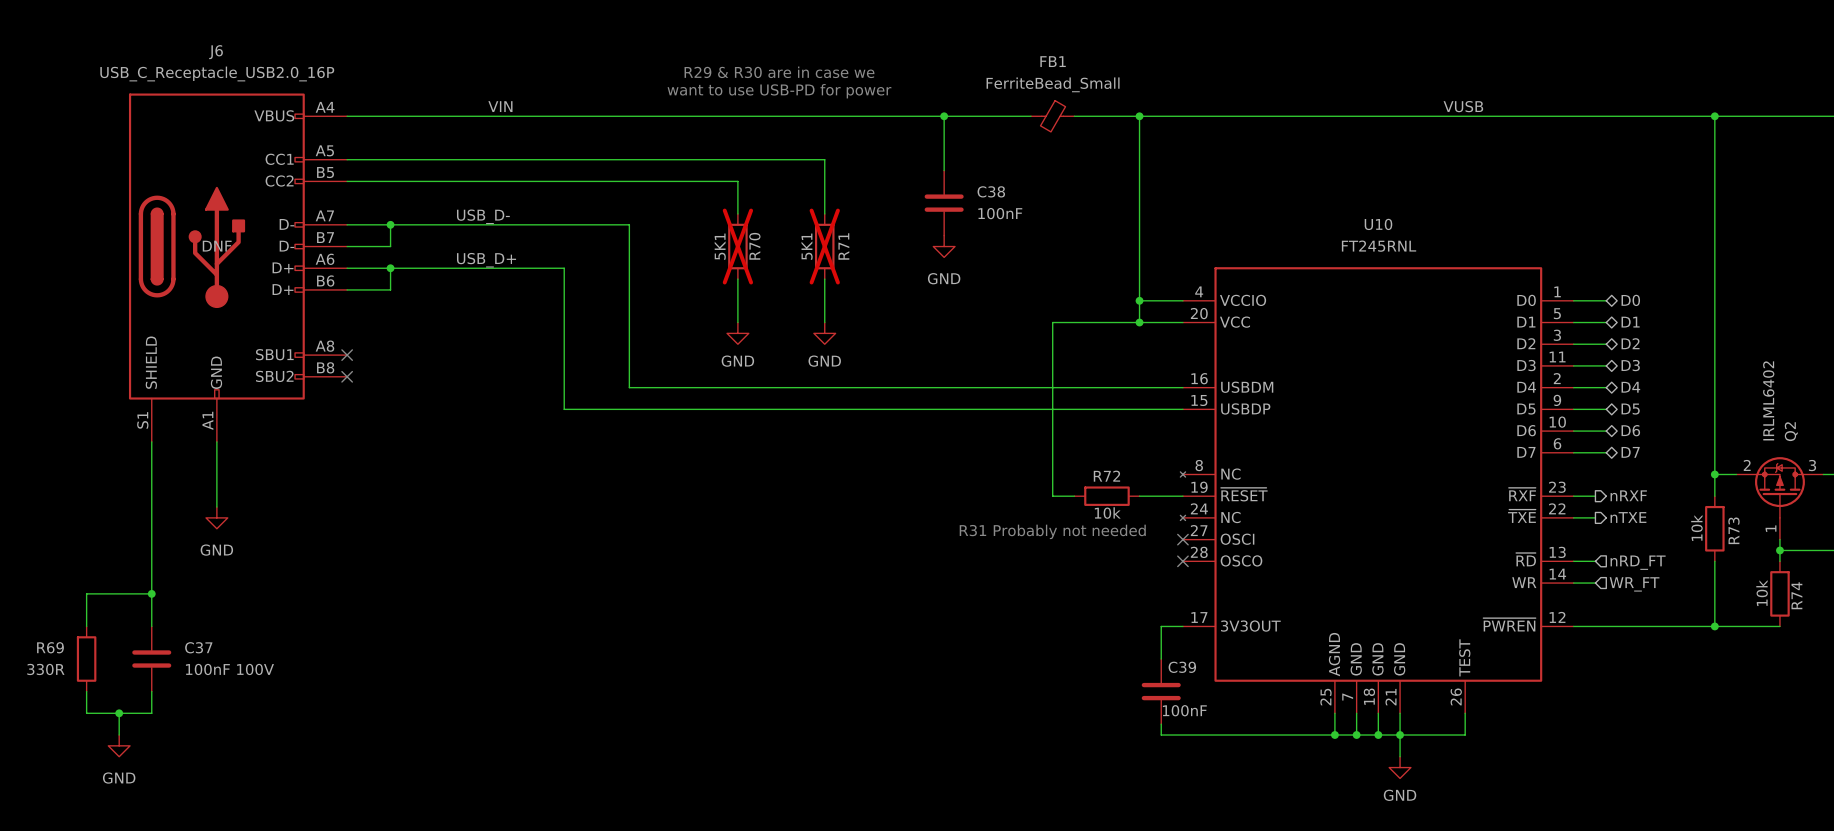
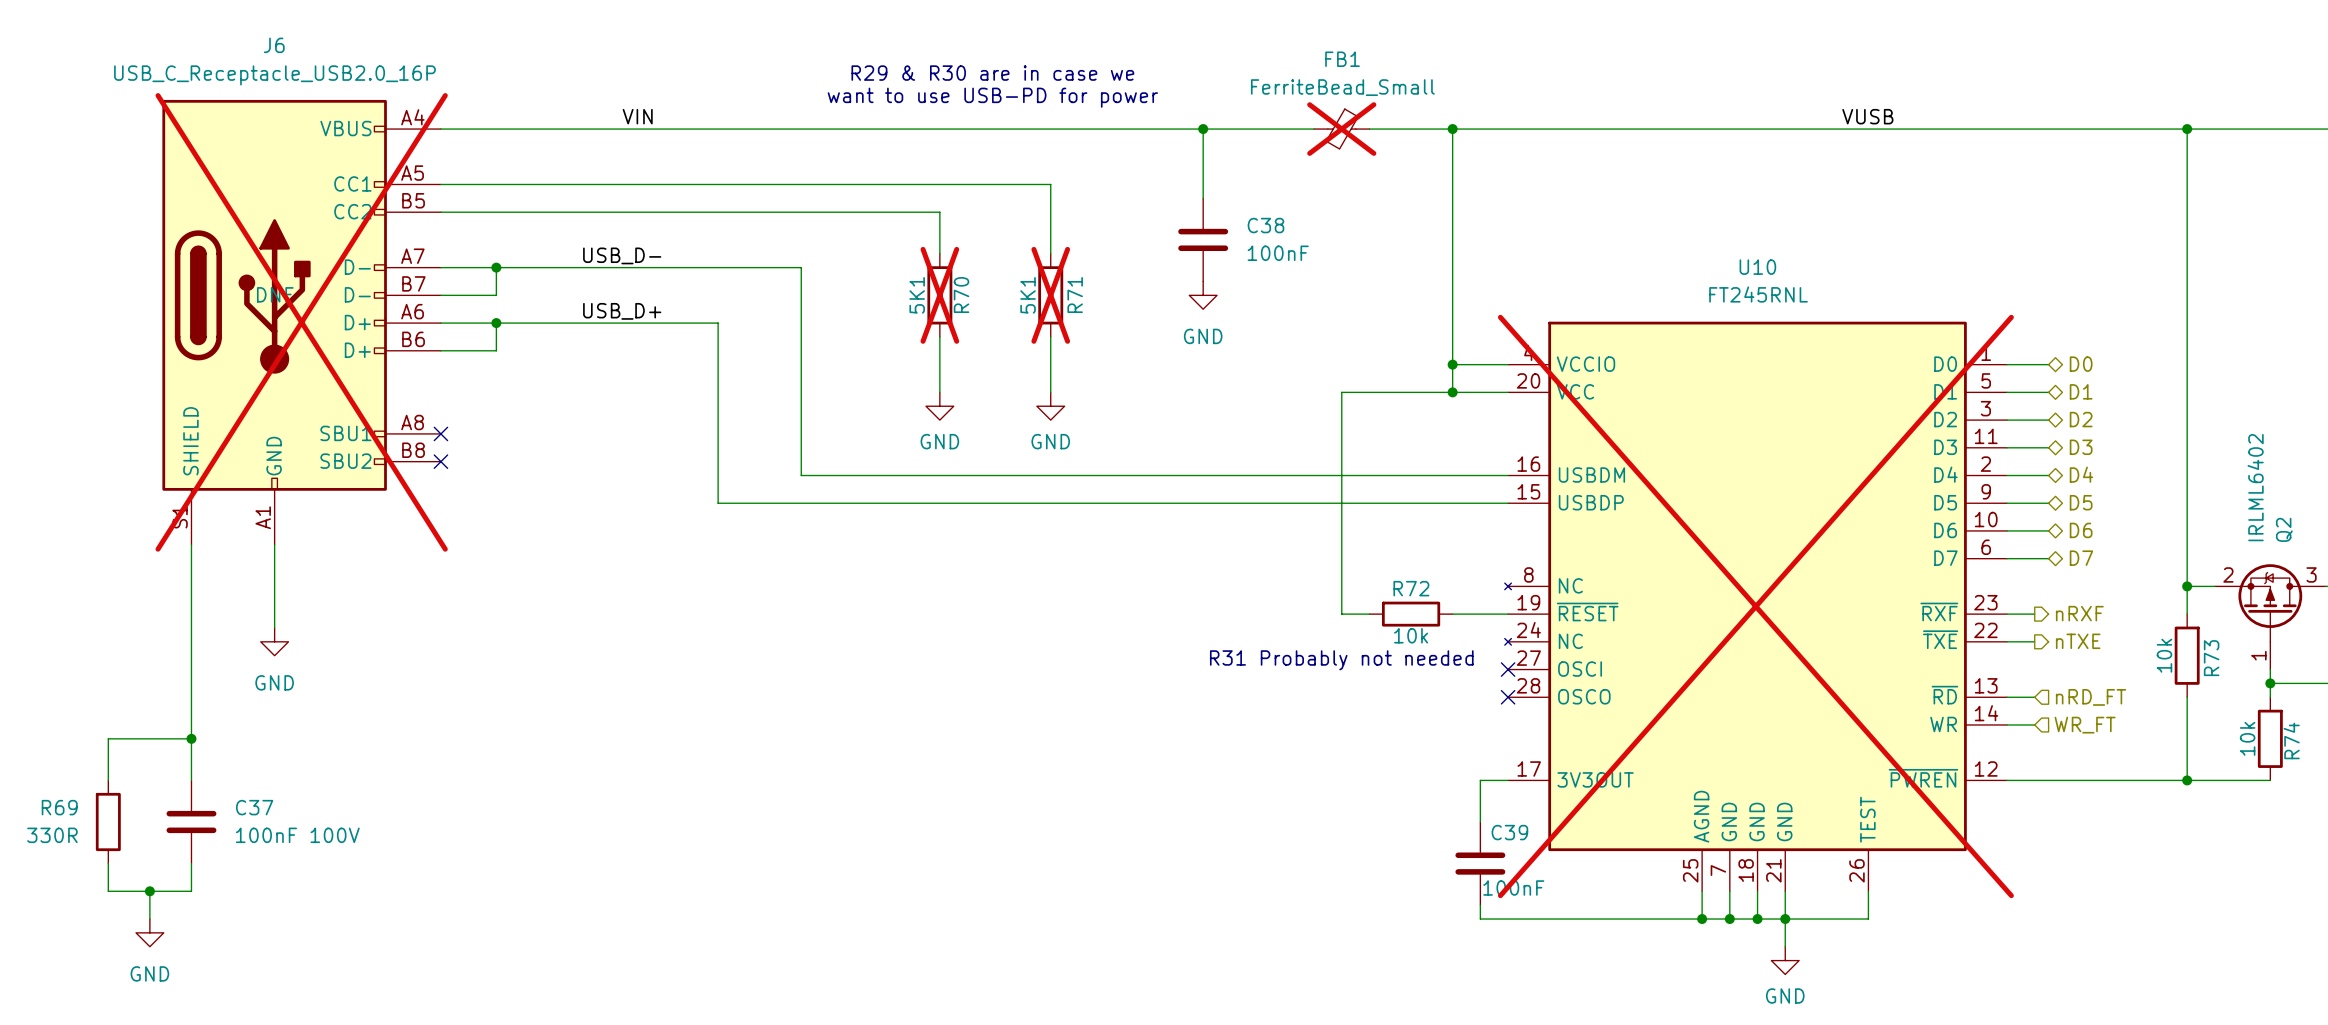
FB1 do-not-place cross: none -> (1341, 129)
J6 do-not-place cross: none -> (301, 322)
U10 do-not-place cross: none -> (1755, 606)

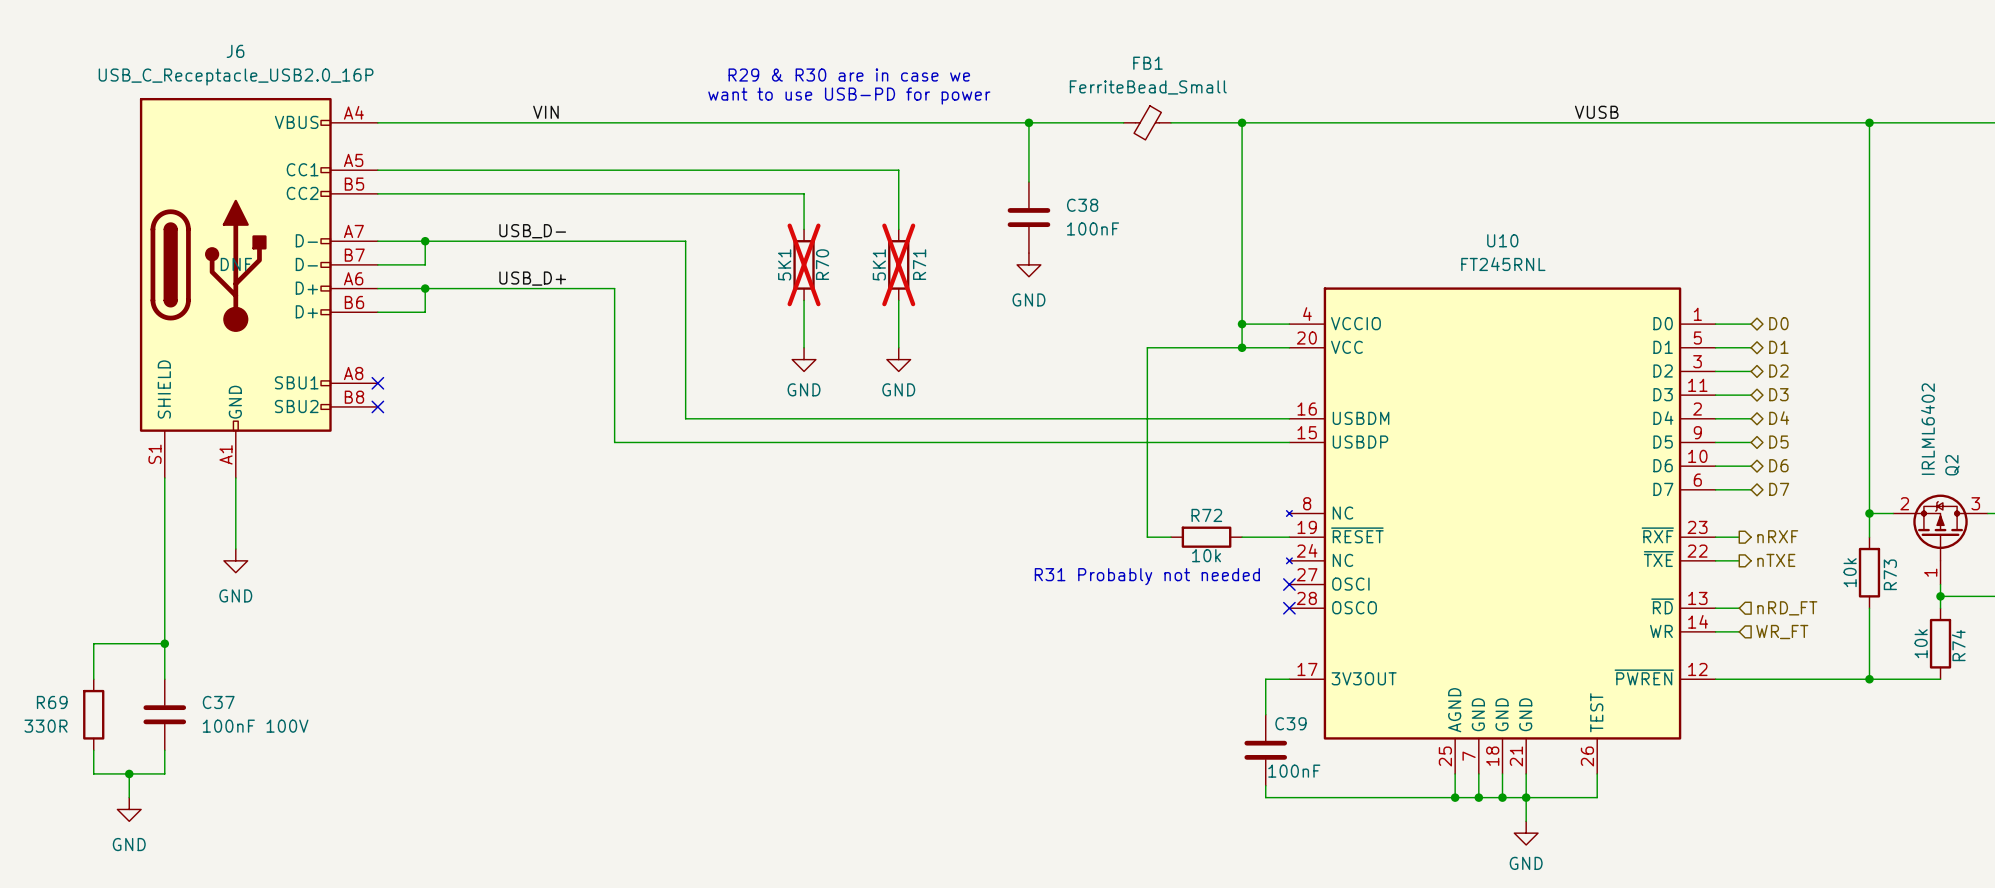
FB1 do-not-place cross: (1341, 129) -> none
J6 do-not-place cross: (301, 322) -> none
U10 do-not-place cross: (1755, 606) -> none

